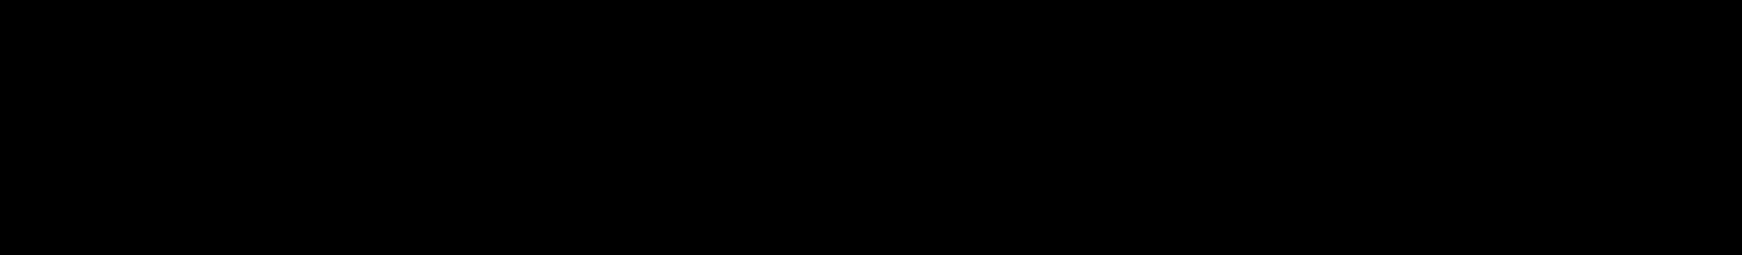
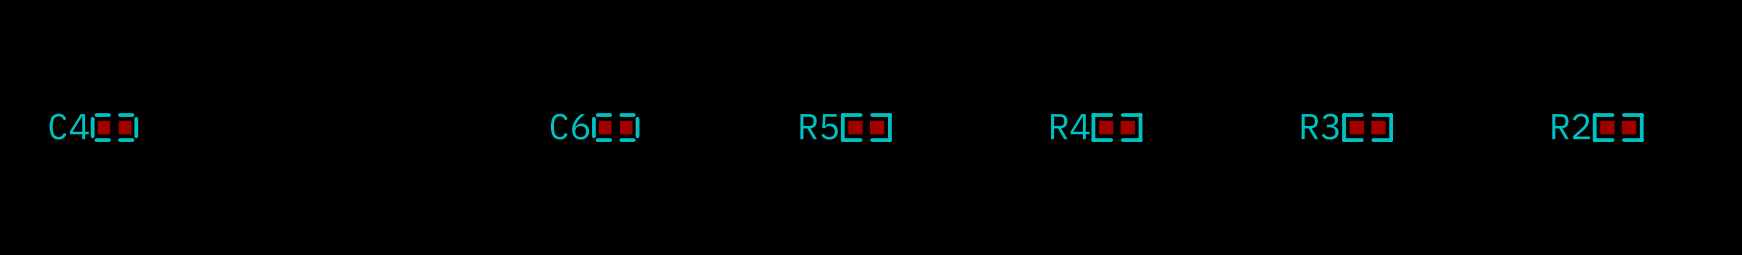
C4: none -> (114, 127)
C6: none -> (615, 127)
R5: none -> (866, 127)
R4: none -> (1116, 127)
R3: none -> (1367, 127)
R2: none -> (1618, 127)

